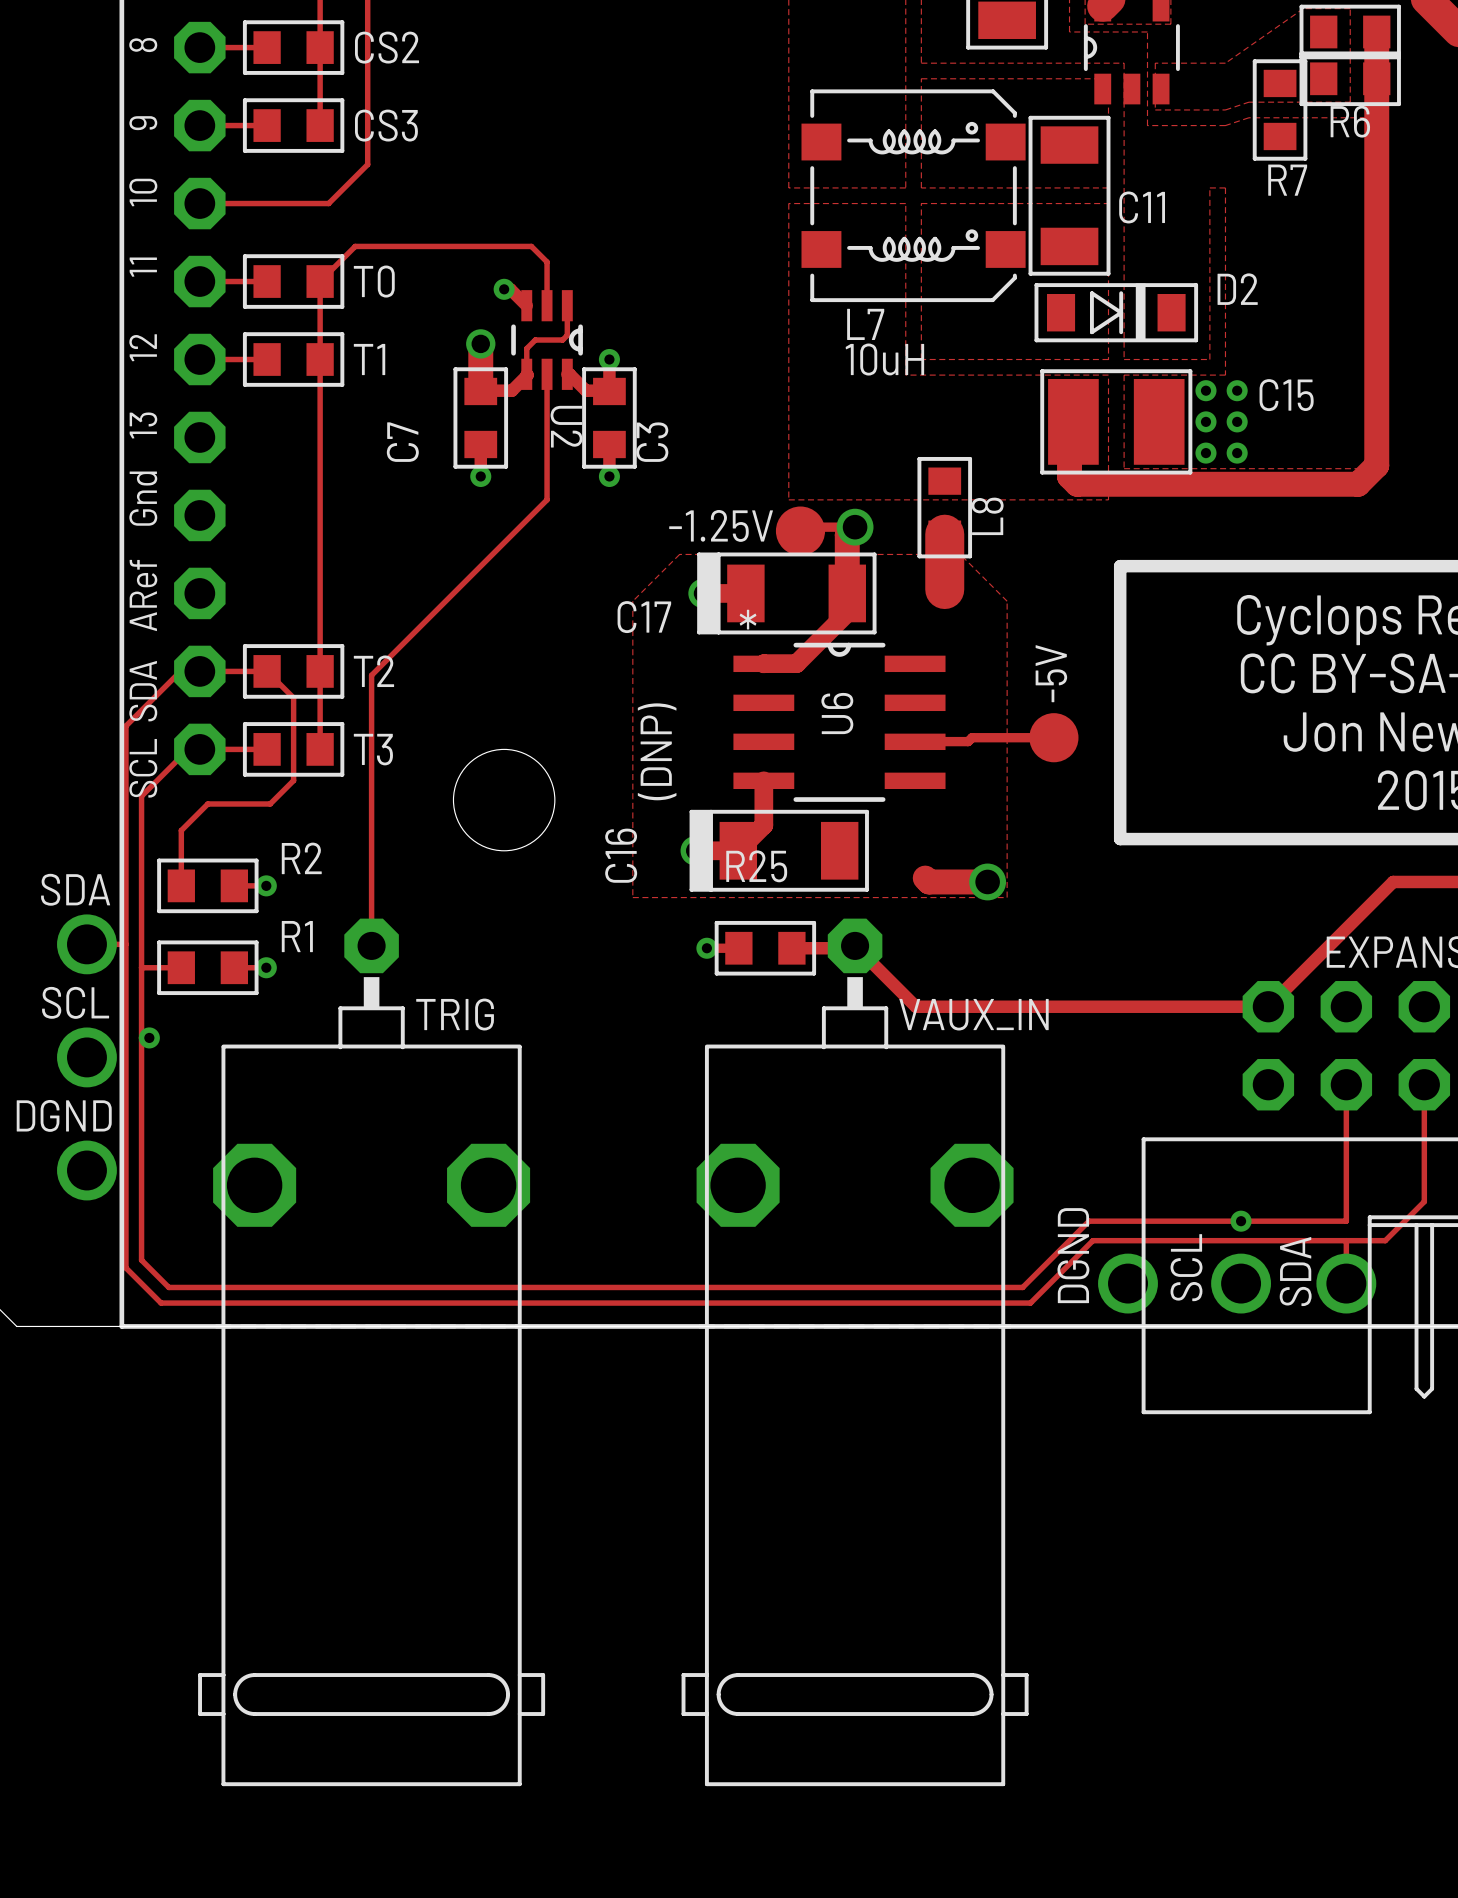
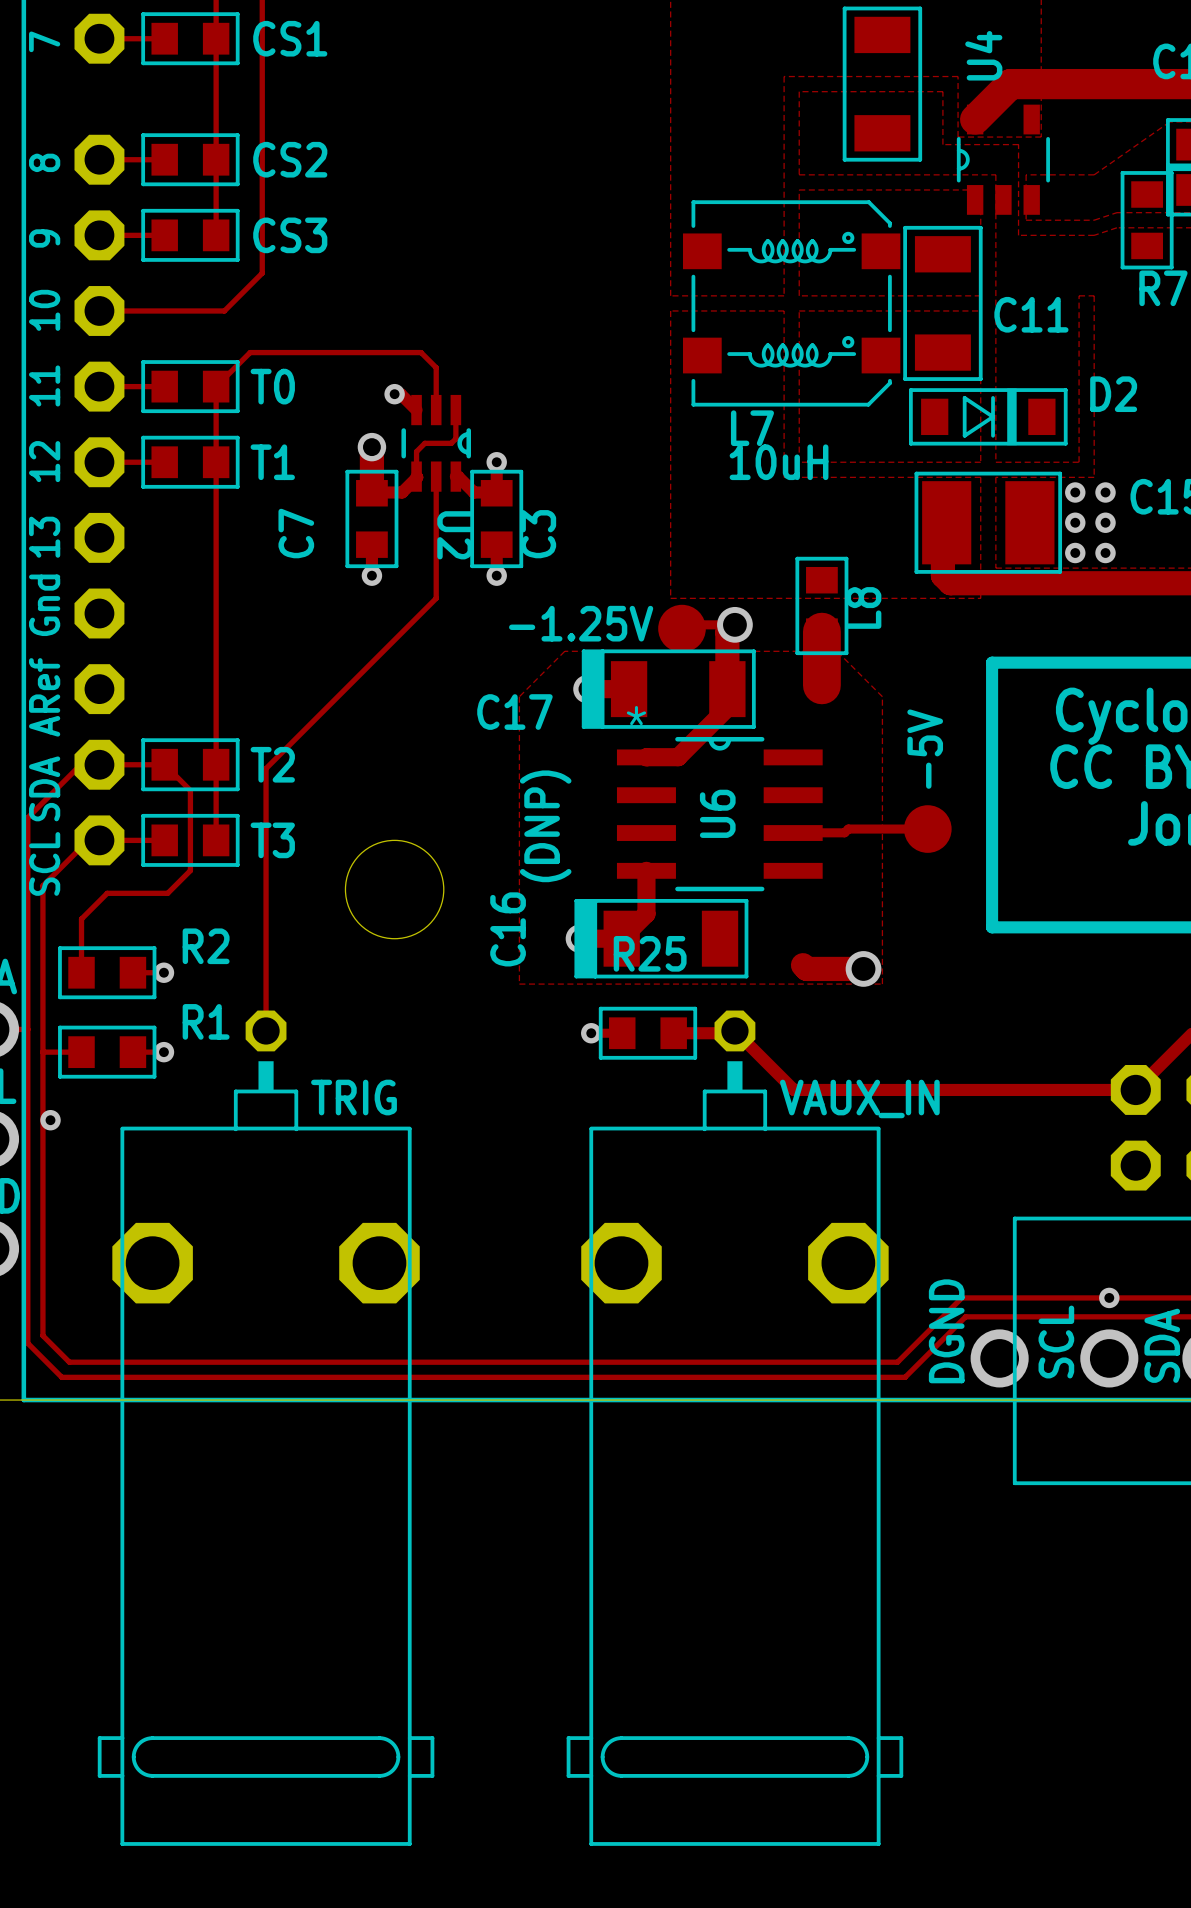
TRIG footprint: [198, 918, 546, 1787] -> [97, 1010, 435, 1846]
VAUX_IN footprint: [681, 918, 1029, 1787] -> [566, 1010, 904, 1846]

